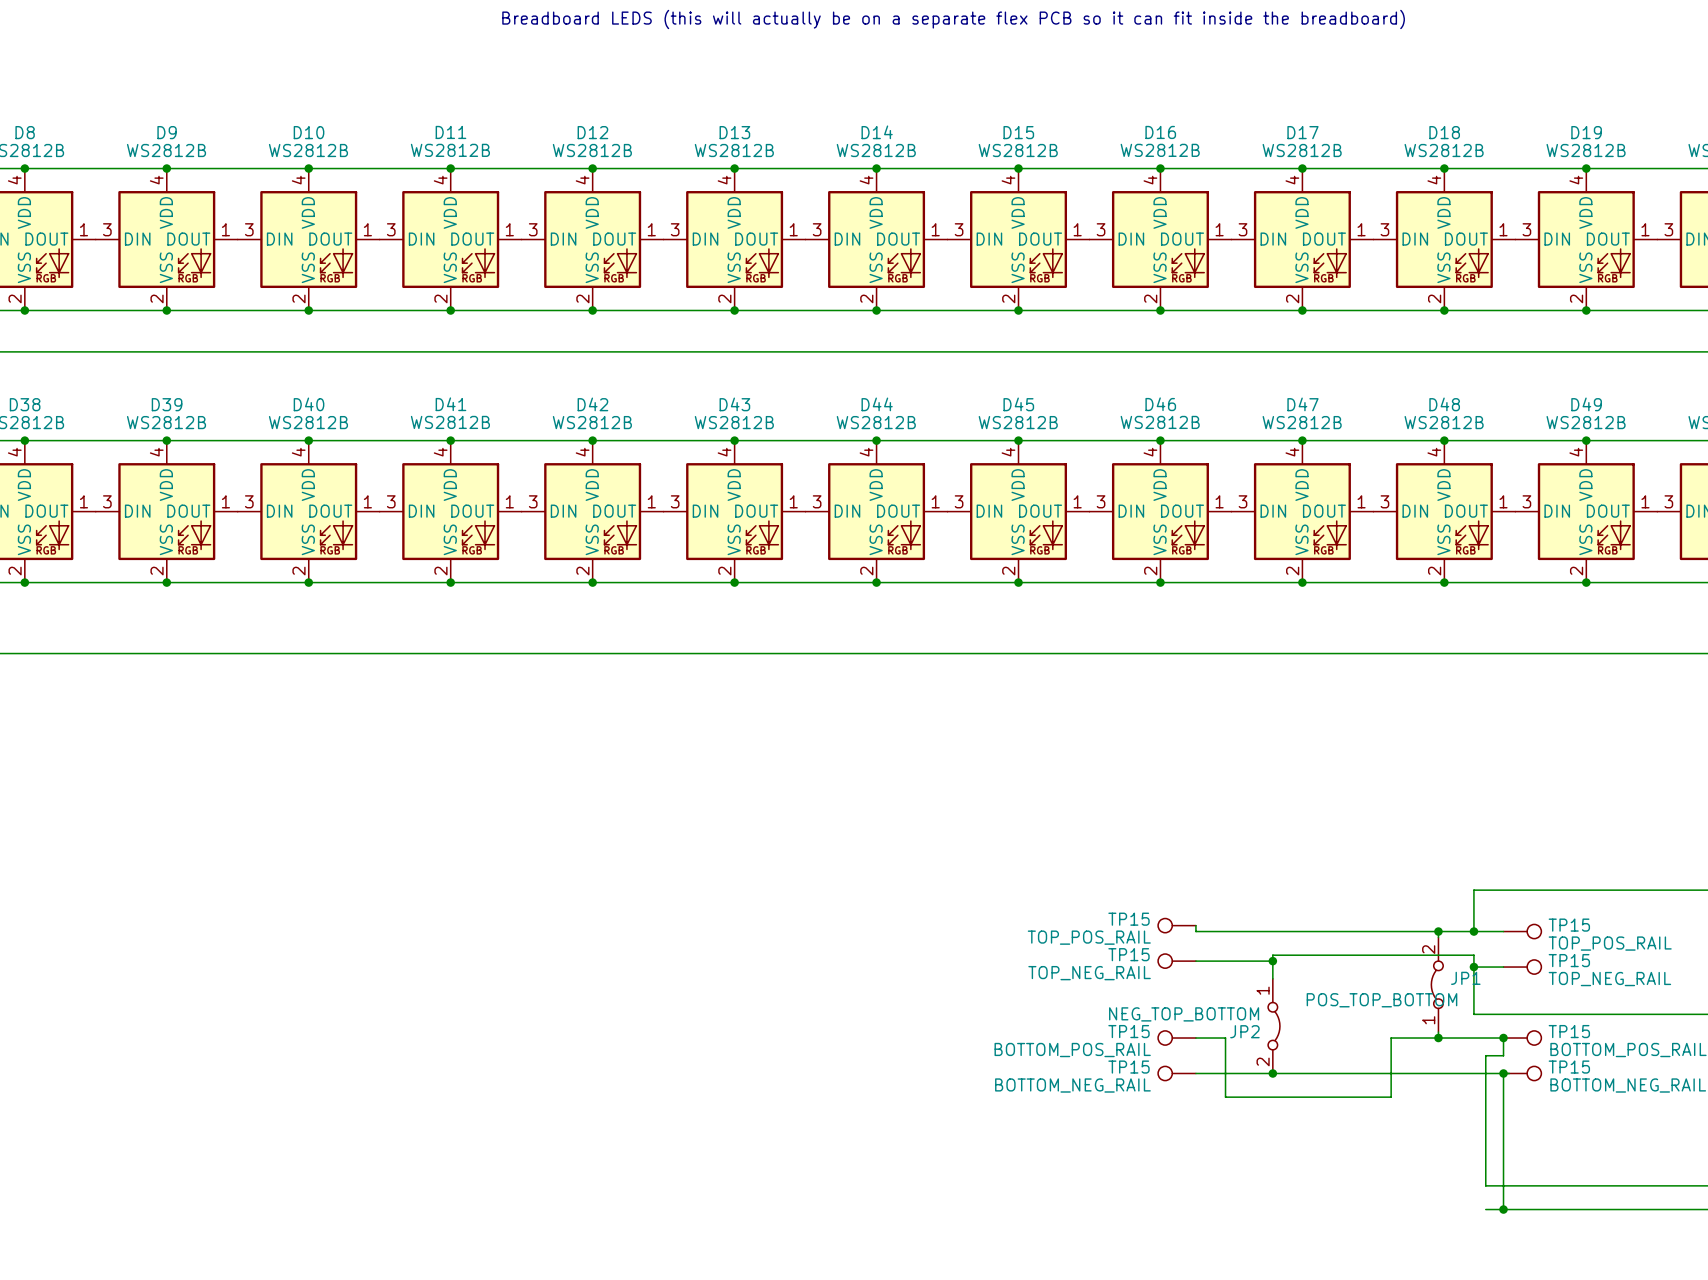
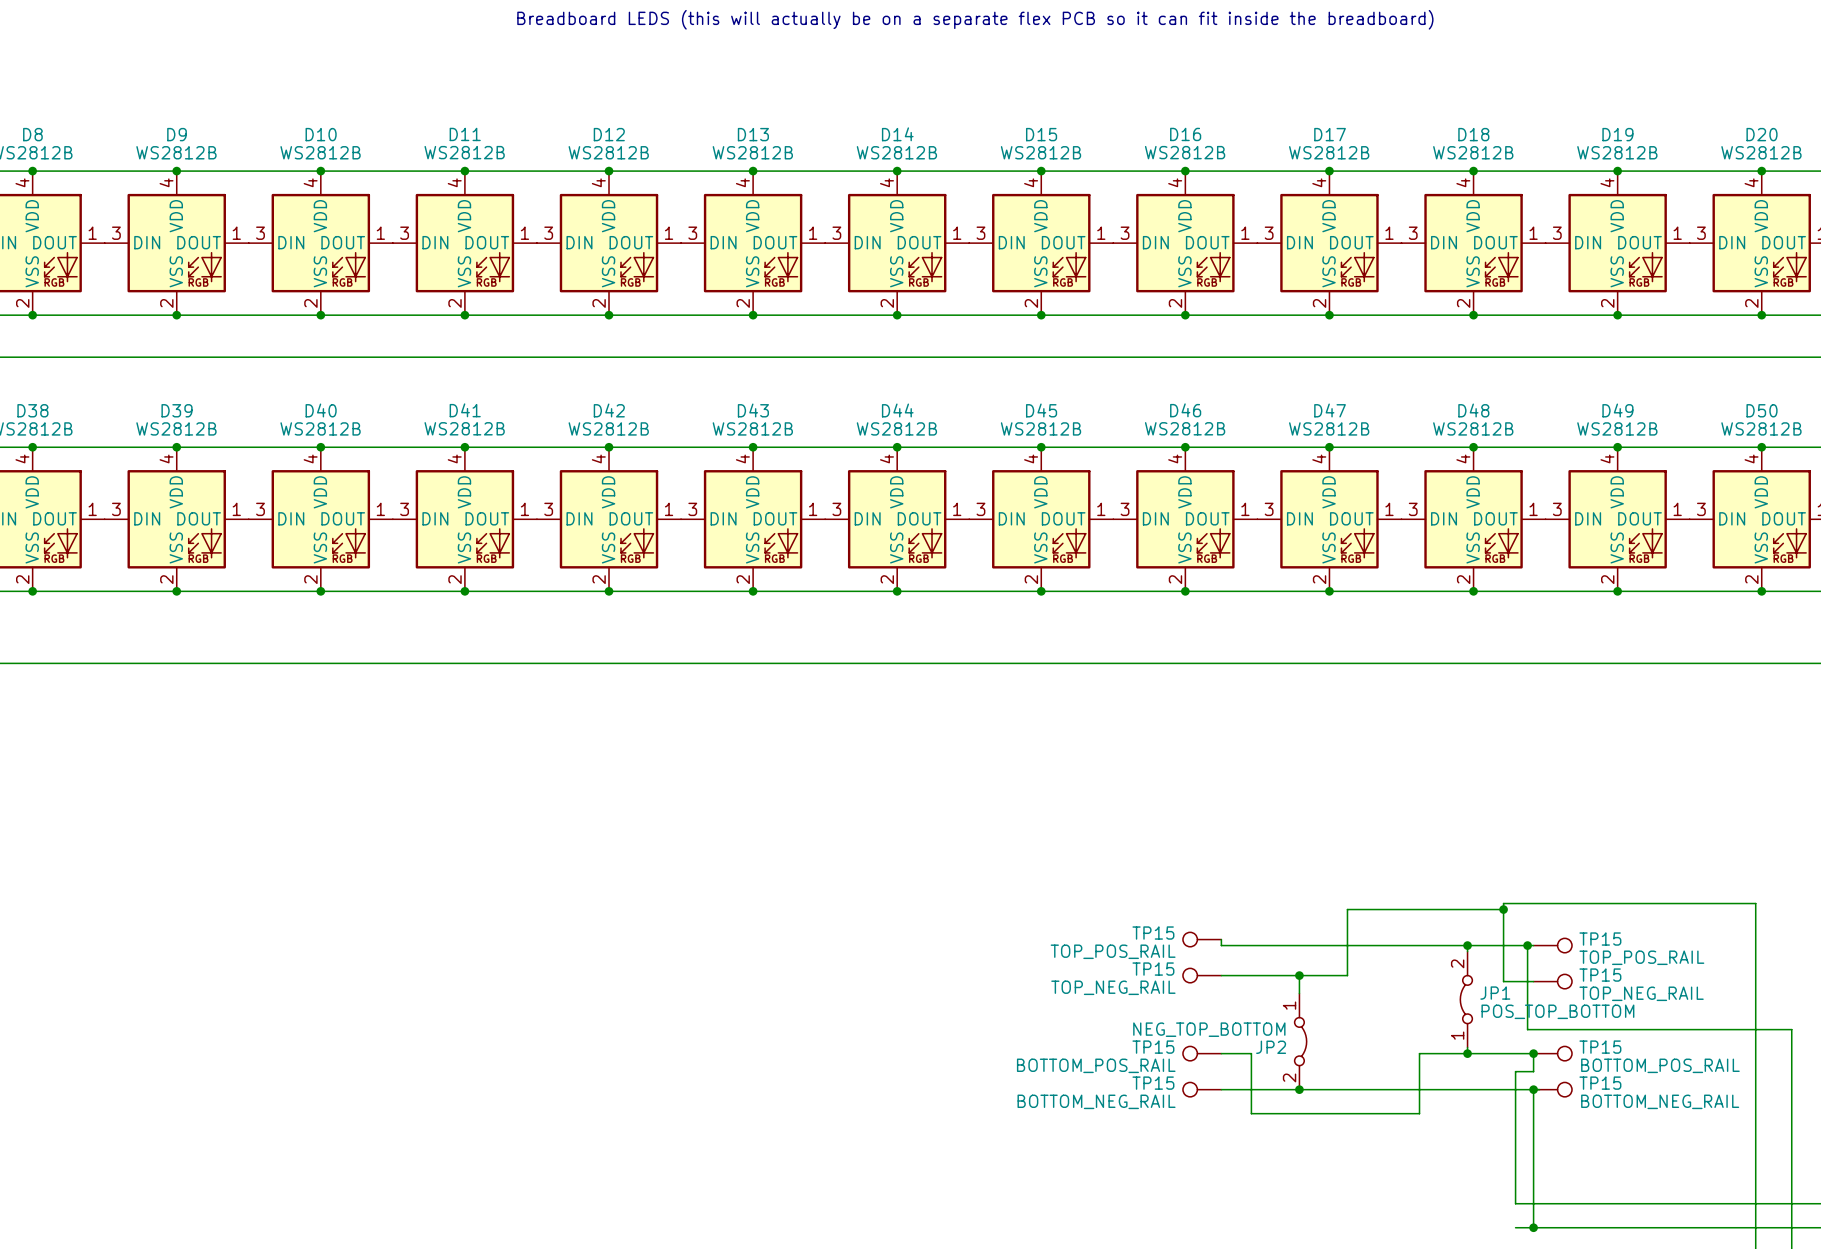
junction: none -> (1503, 909)
wire: none -> (1503, 945) (1503, 969)
junction: (1473, 931) -> none
junction: none -> (1527, 945)
wire: (1473, 955) (1272, 955) (1272, 961) -> (1503, 909) (1347, 909) (1347, 975) (1299, 975)
wire: (1473, 967) (1473, 1014) (1497, 1014) -> (1527, 945) (1527, 1029)
junction: (1473, 967) -> none
JP1 value position: POS_TOP_BOTTOM (1381, 1000) -> POS_TOP_BOTTOM (1557, 1011)

